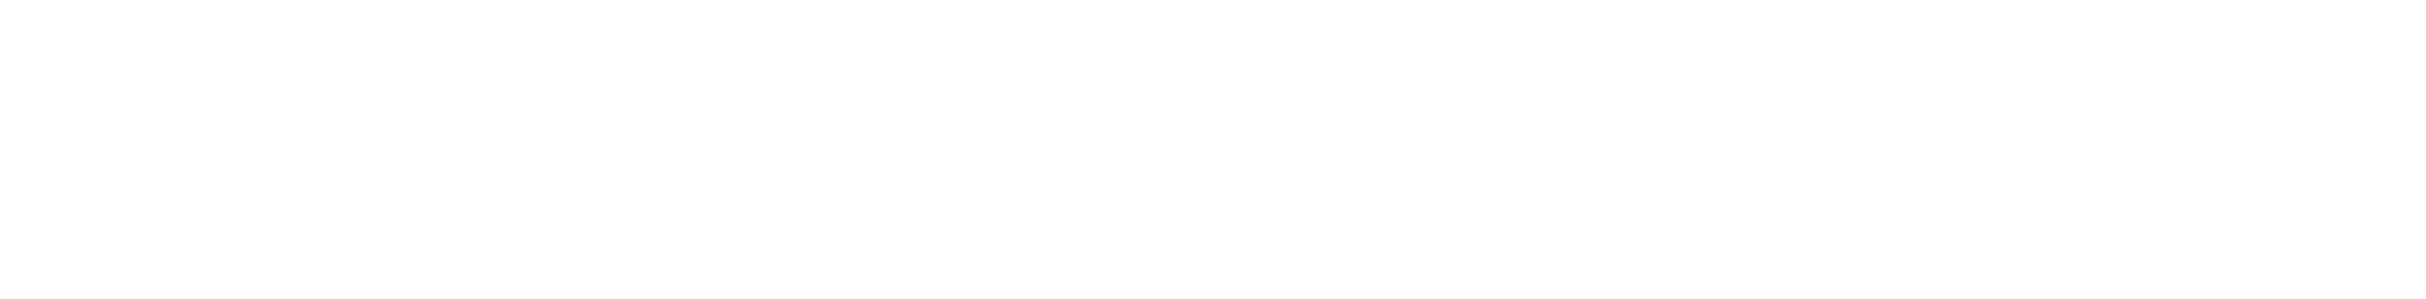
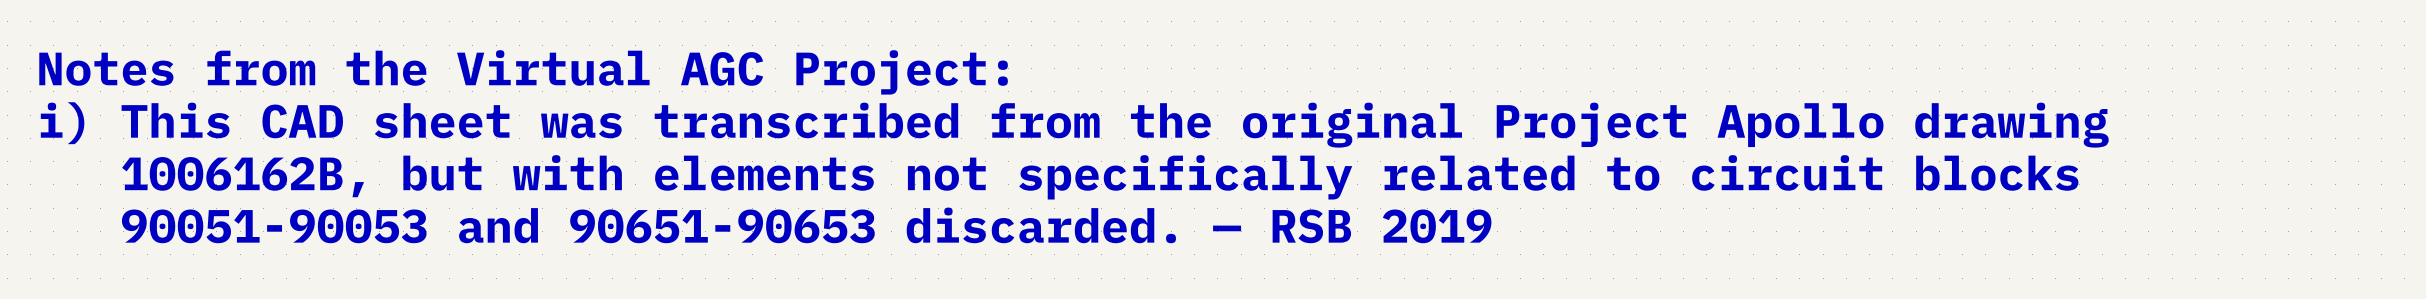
text: none -> Notes from the Virtual AGC Project: (523, 72)
text: none -> i) This CAD sheet was transcribed from the original Project Apollo drawing (1074, 124)
text: none -> 1006162B, but with elements not specifically related to circuit blocks (1100, 177)
text: none -> 90051-90053 and 90651-90653 discarded. — RSB 2019 (806, 225)

